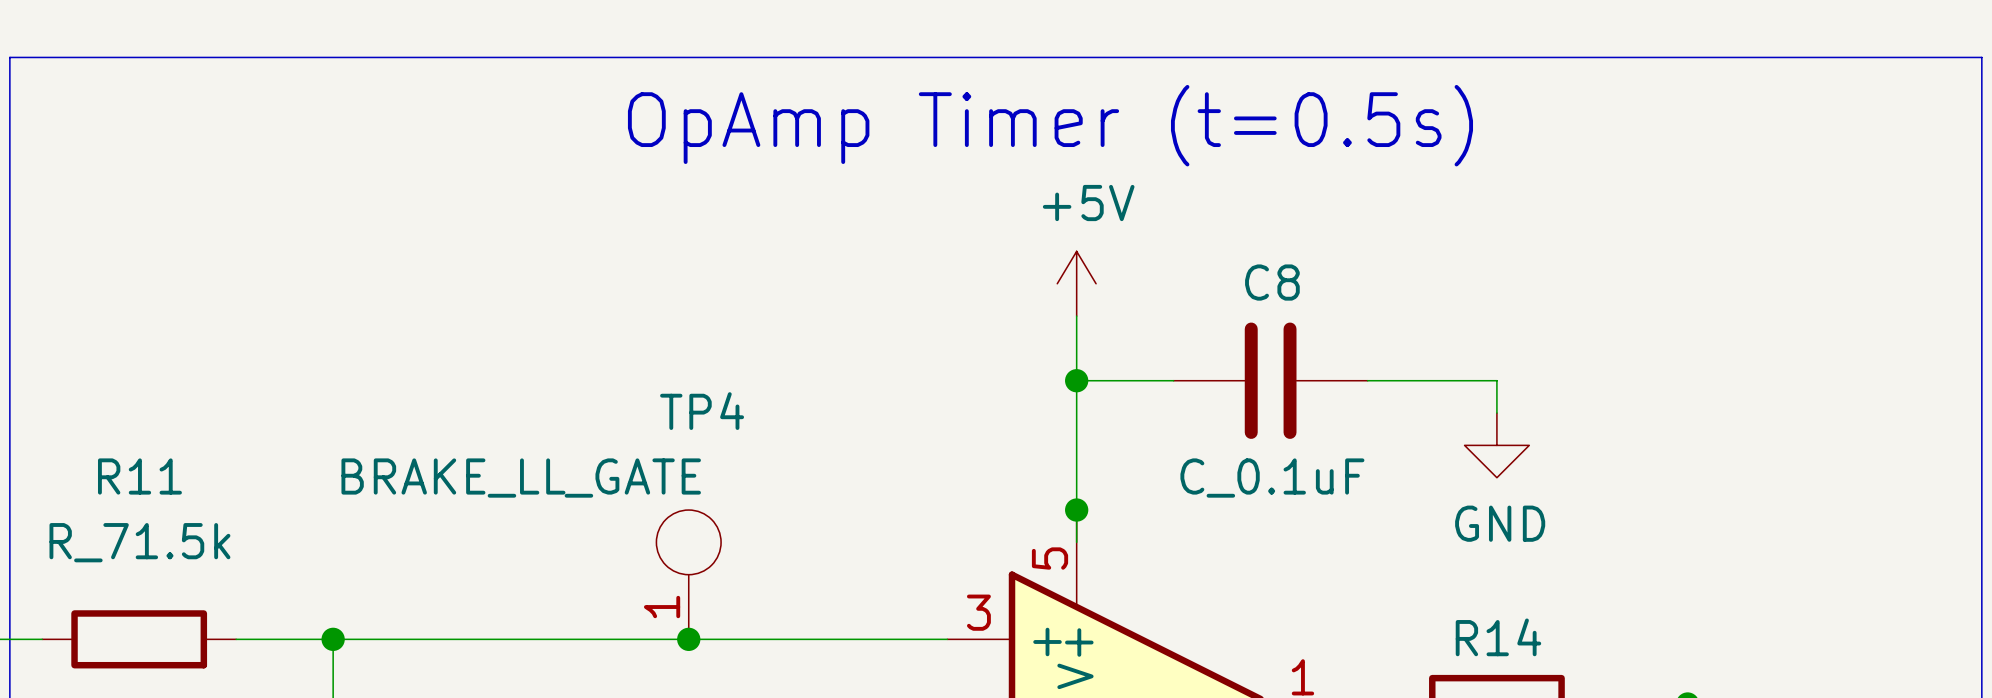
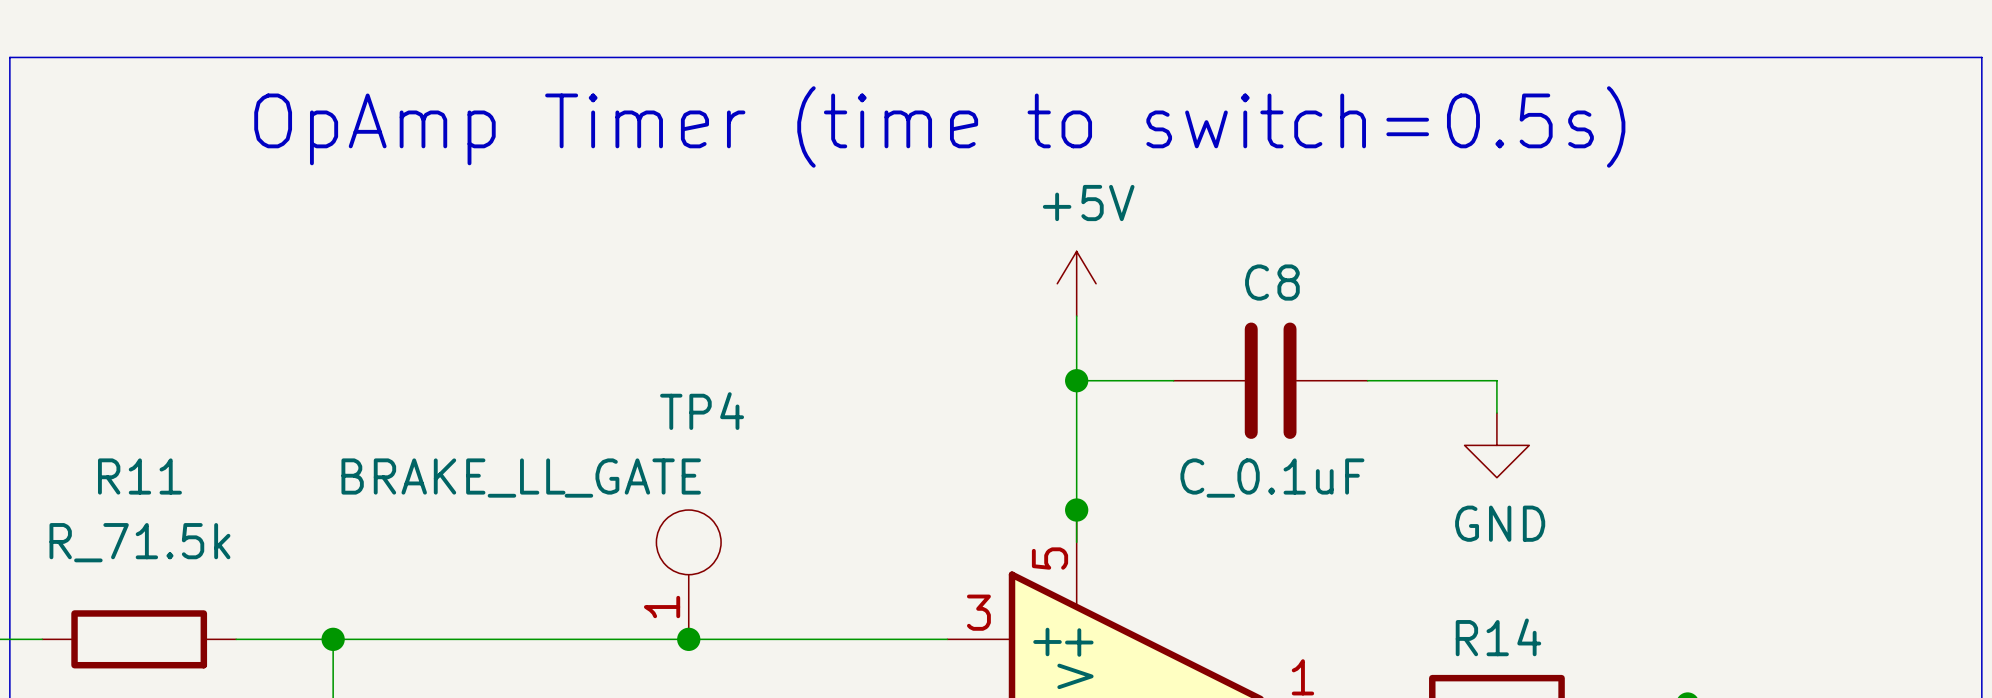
text: OpAmp Timer (t=0.5s) (1050, 125) -> OpAmp Timer (time to switch=0.5s) (939, 126)

